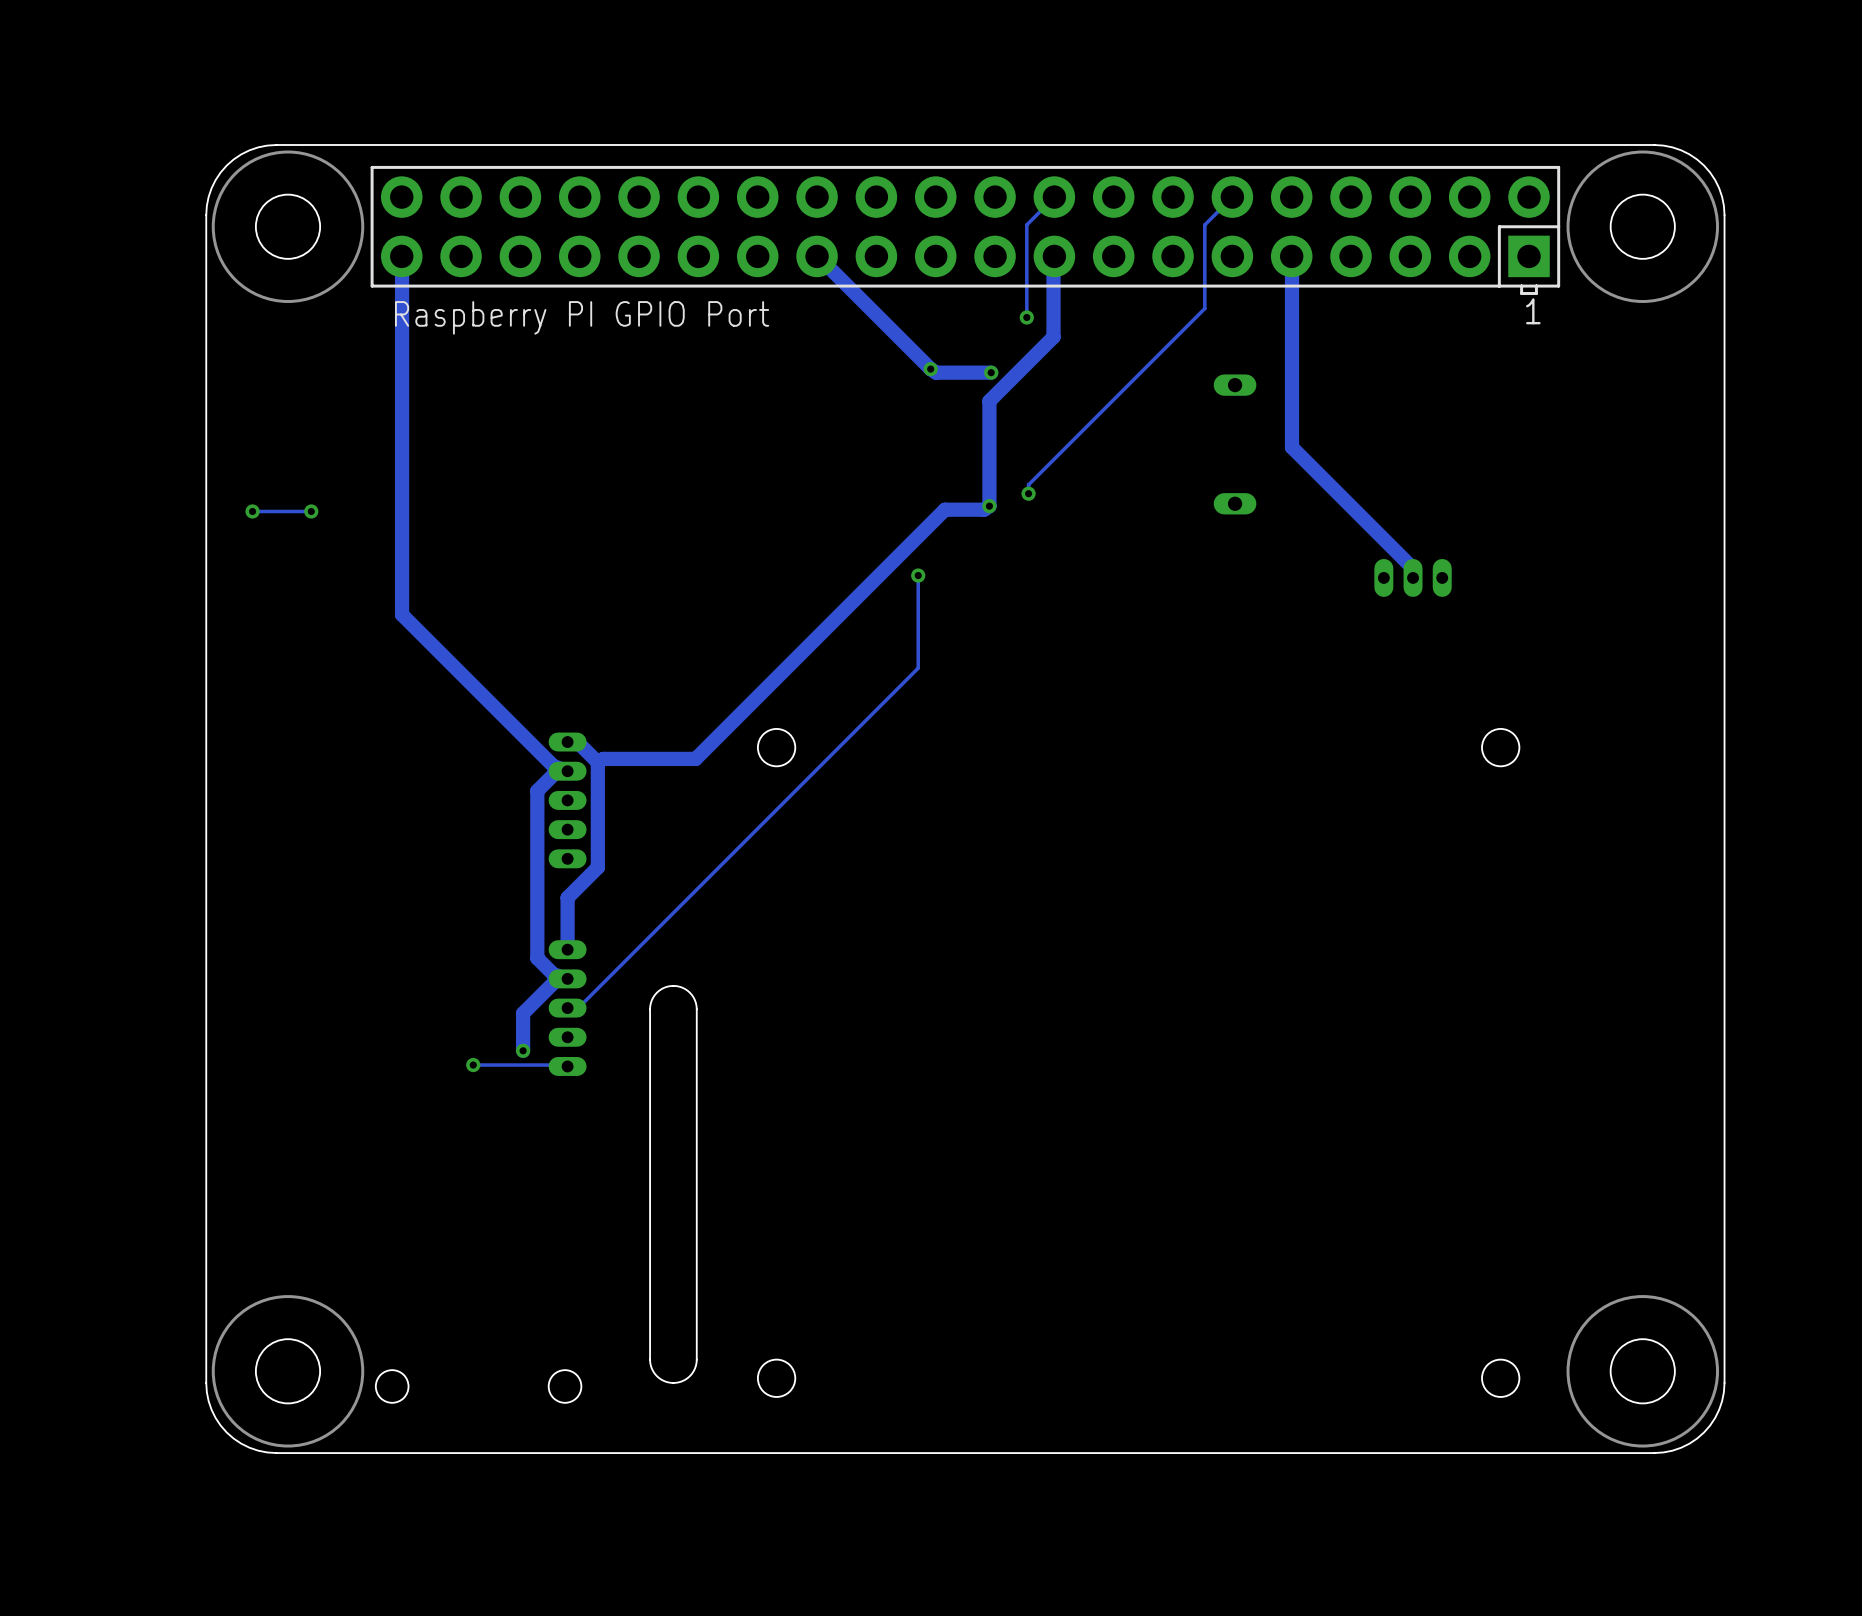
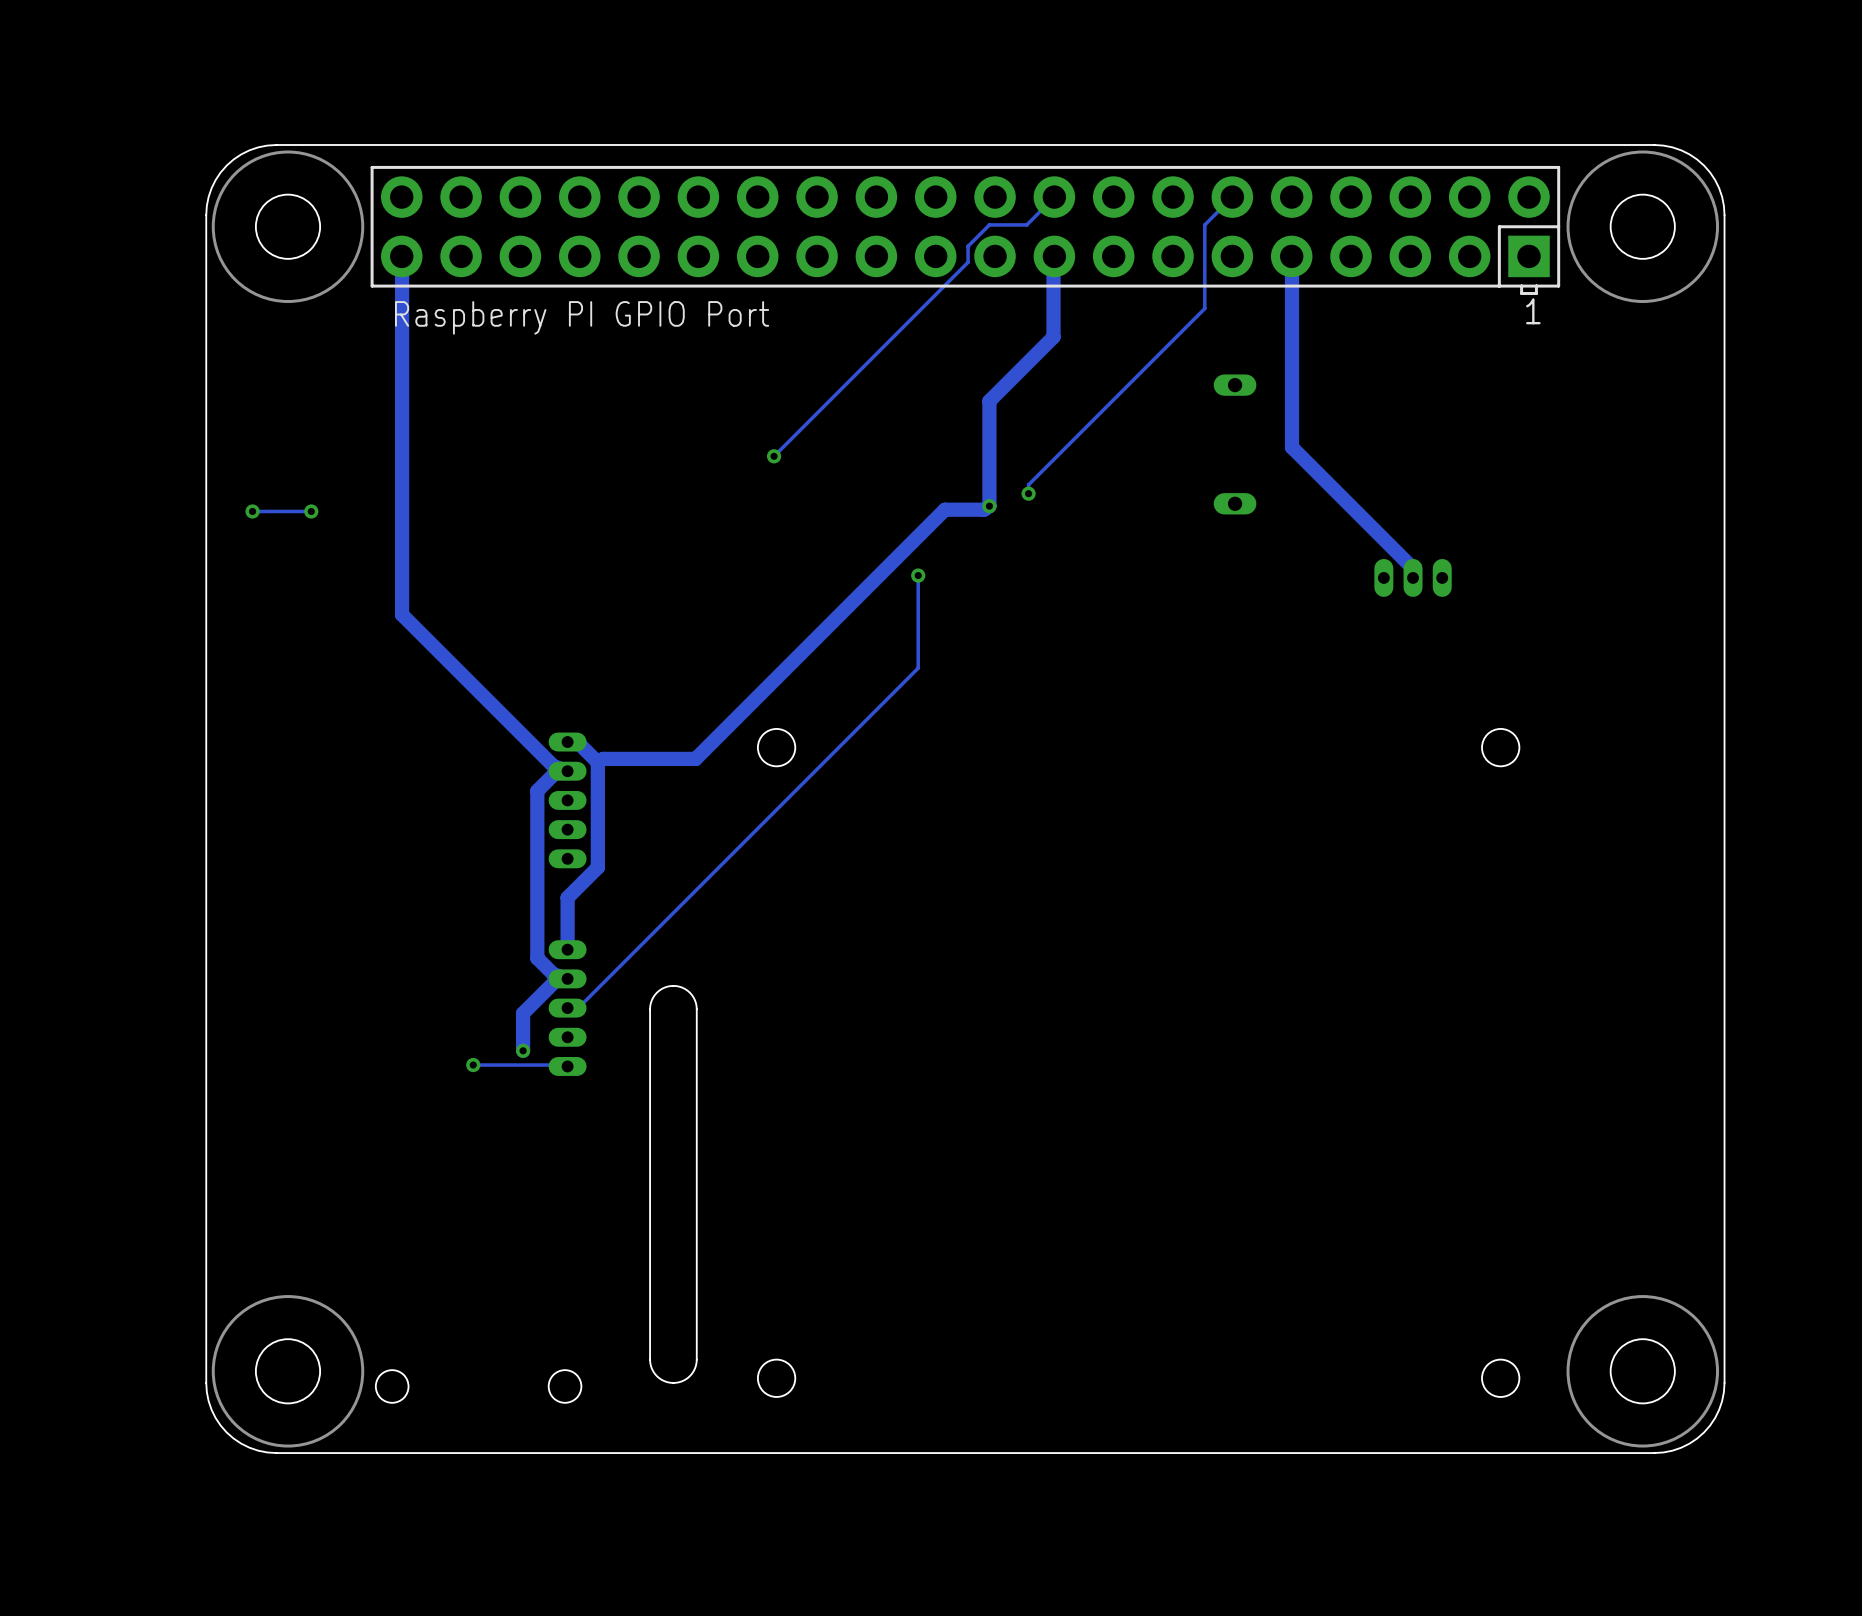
track: (1026, 224) (1026, 317) -> (1026, 224) (989, 224) (968, 246) (968, 262) (774, 456)
track: (817, 256) (930, 369) (936, 372) (991, 372) -> none
via: (1026, 317) -> none
via: (930, 369) -> none
via: (991, 372) -> none
via: none -> (774, 456)

